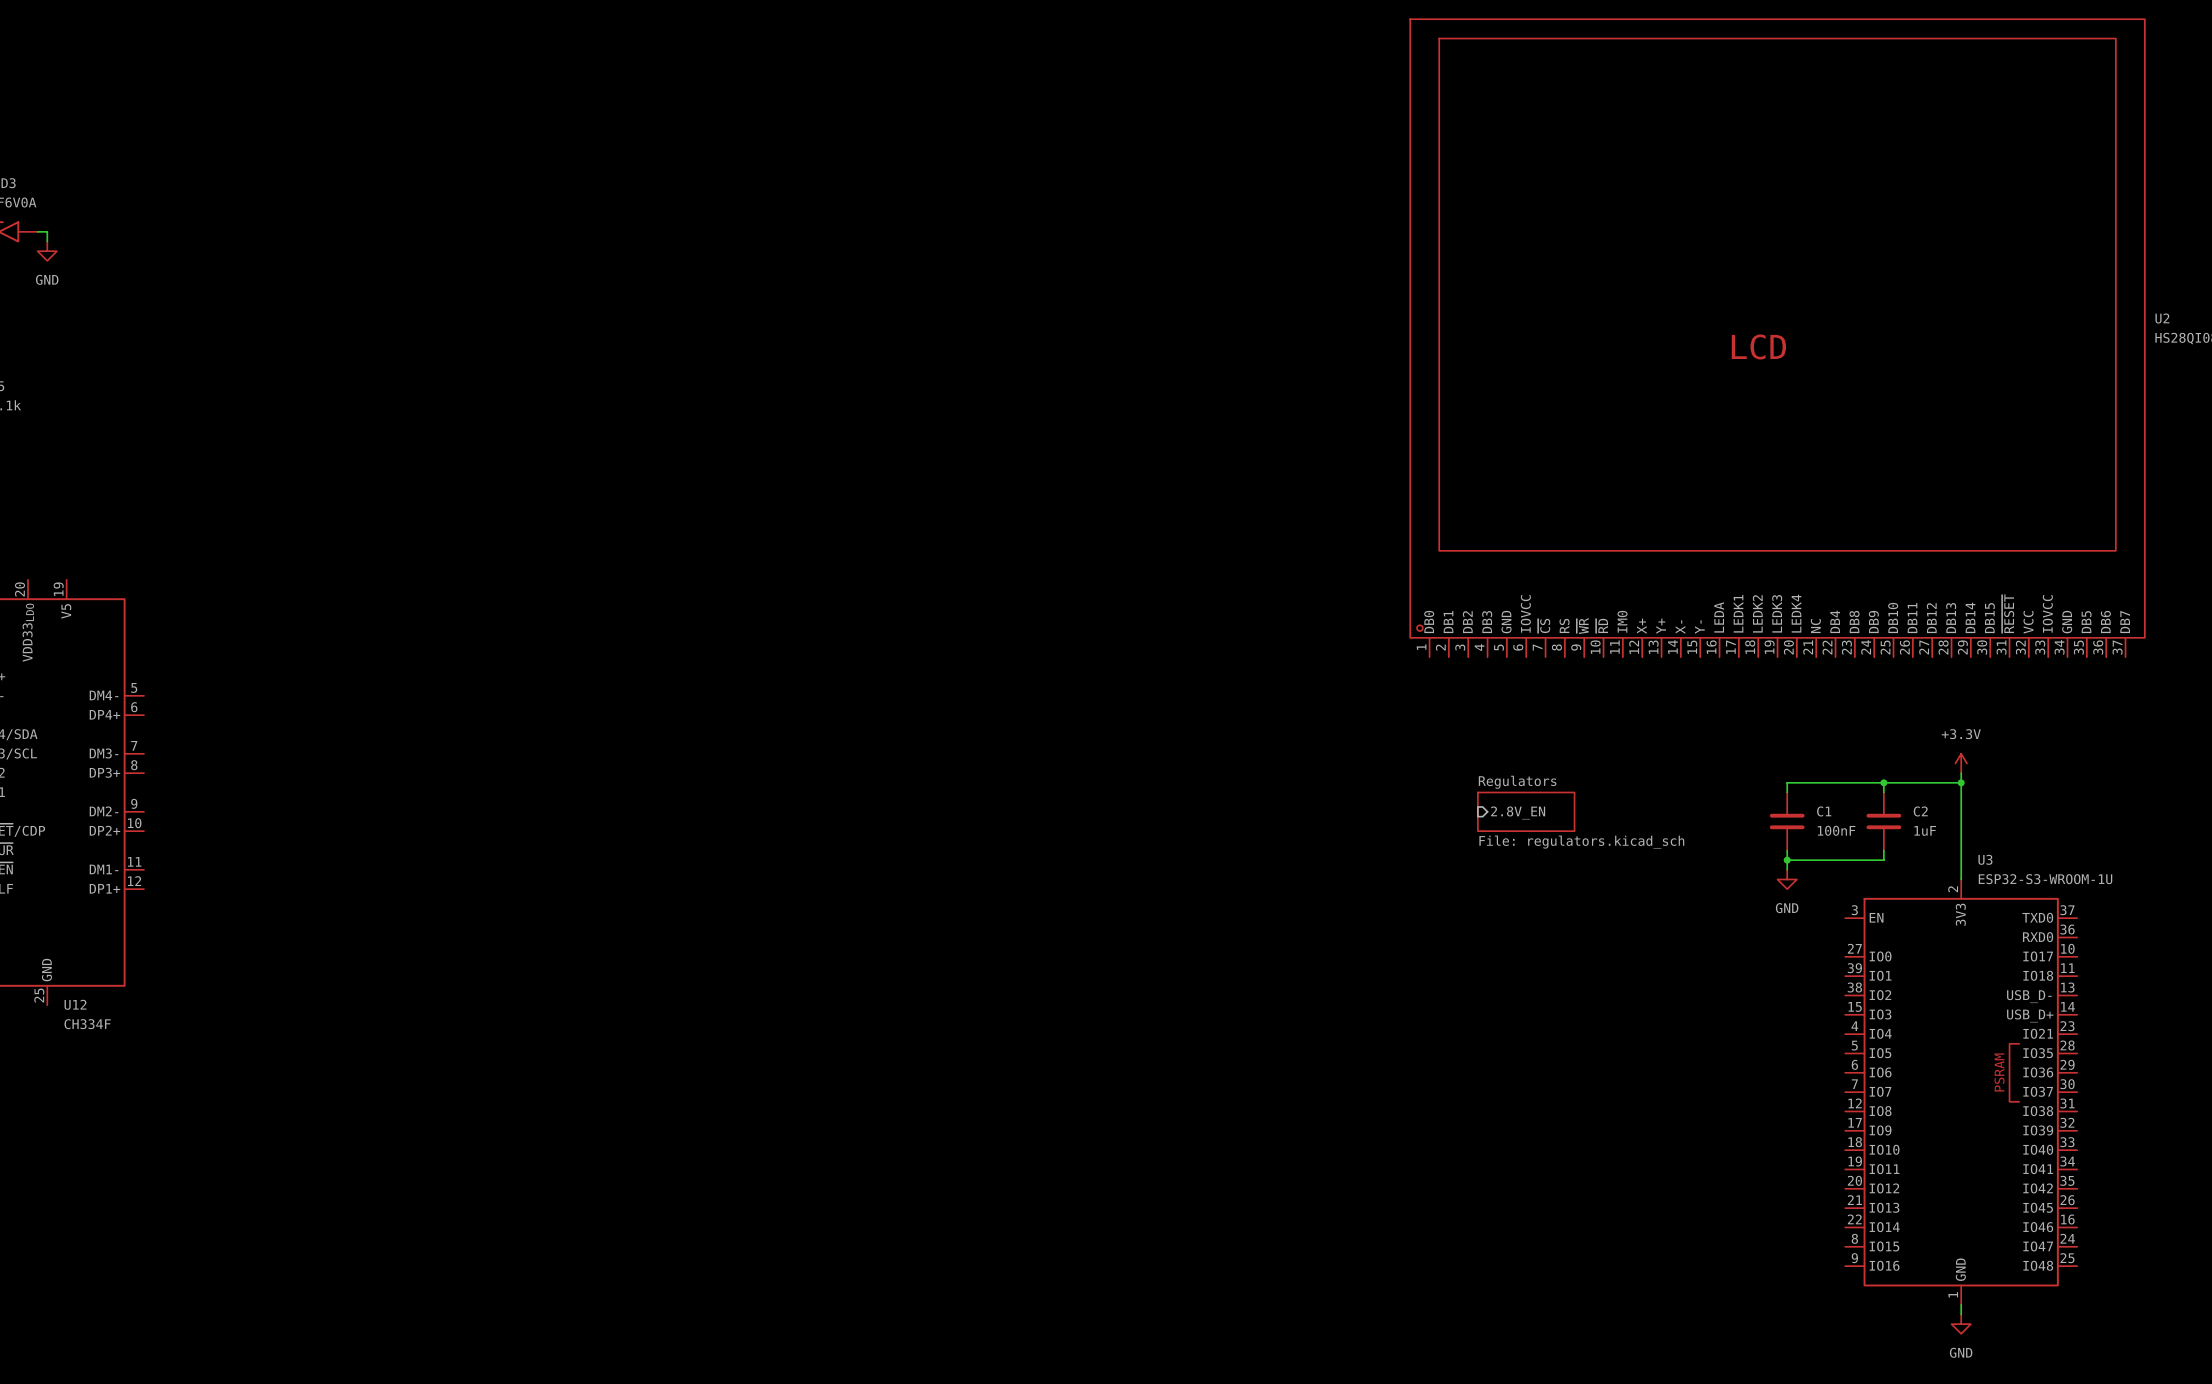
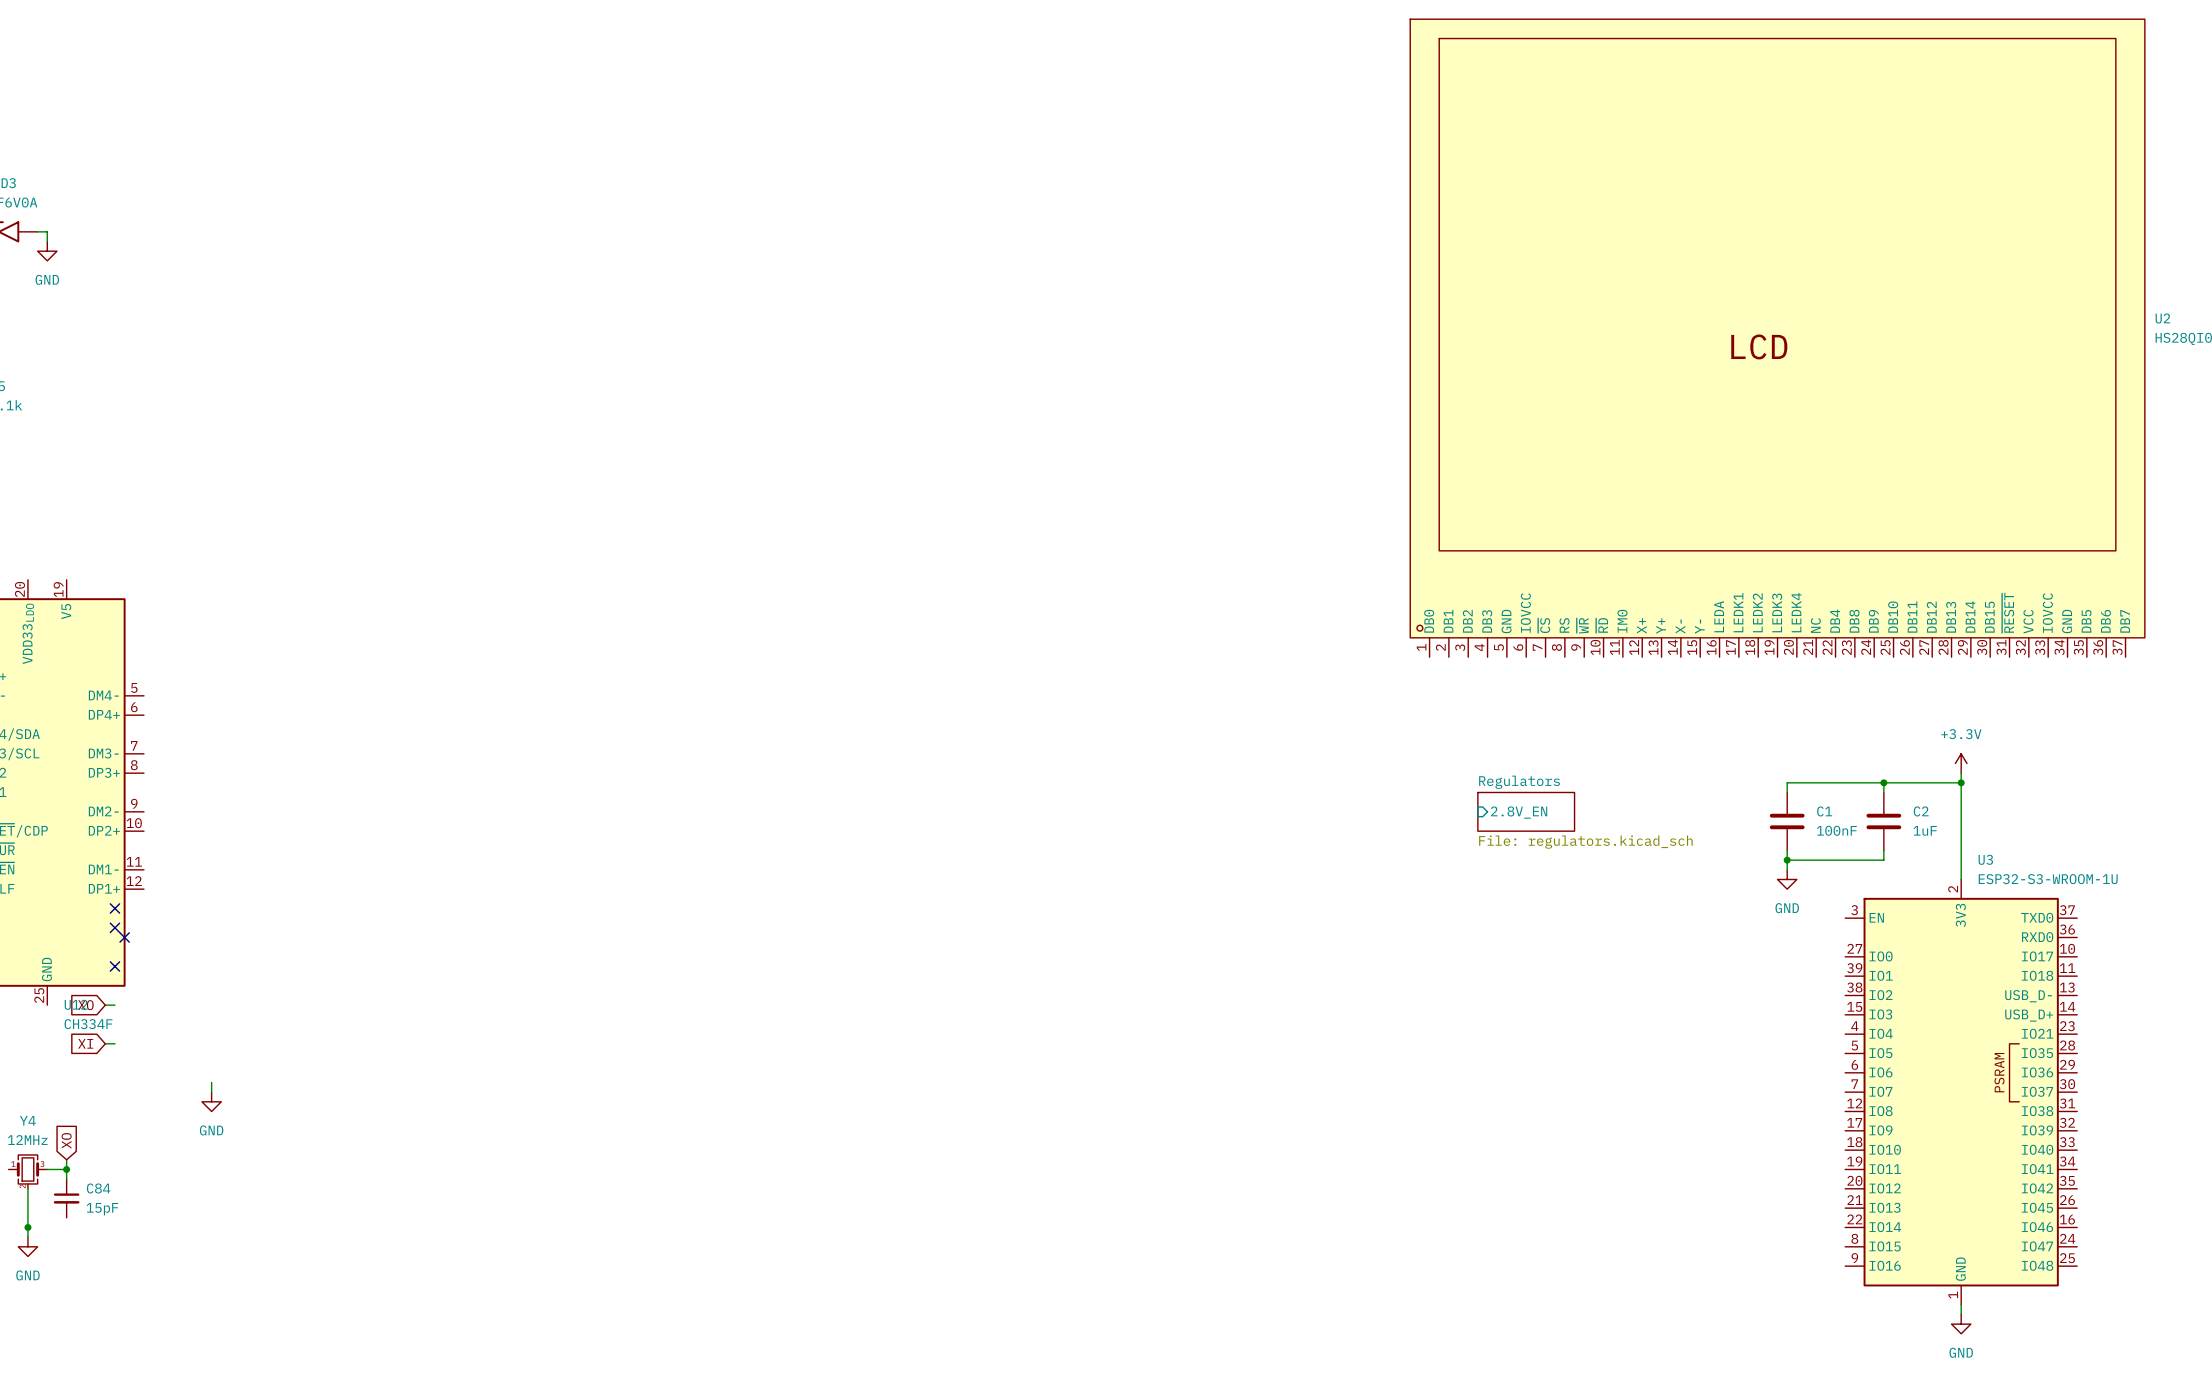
no-connect mark: none -> (114, 908)
no-connect mark: none -> (114, 927)
no-connect mark: none -> (124, 937)
no-connect mark: none -> (114, 966)
global label: none -> XO (85, 1005)
wire: none -> (105, 1005) (114, 1005)
global label: none -> XI (85, 1043)
wire: none -> (105, 1043) (114, 1043)
wire: none -> (211, 1082) (211, 1092)
power symbol: none -> GND (211, 1101)
global label: none -> XO (66, 1140)
wire: none -> (66, 1159) (66, 1179)
wire: none -> (47, 1169) (66, 1169)
junction: none -> (66, 1169)
Y4: none -> 12MHz (27, 1171)
wire: none -> (27, 1188) (27, 1237)
C84: none -> 15pF (66, 1198)
junction: none -> (27, 1227)
power symbol: none -> GND (27, 1246)

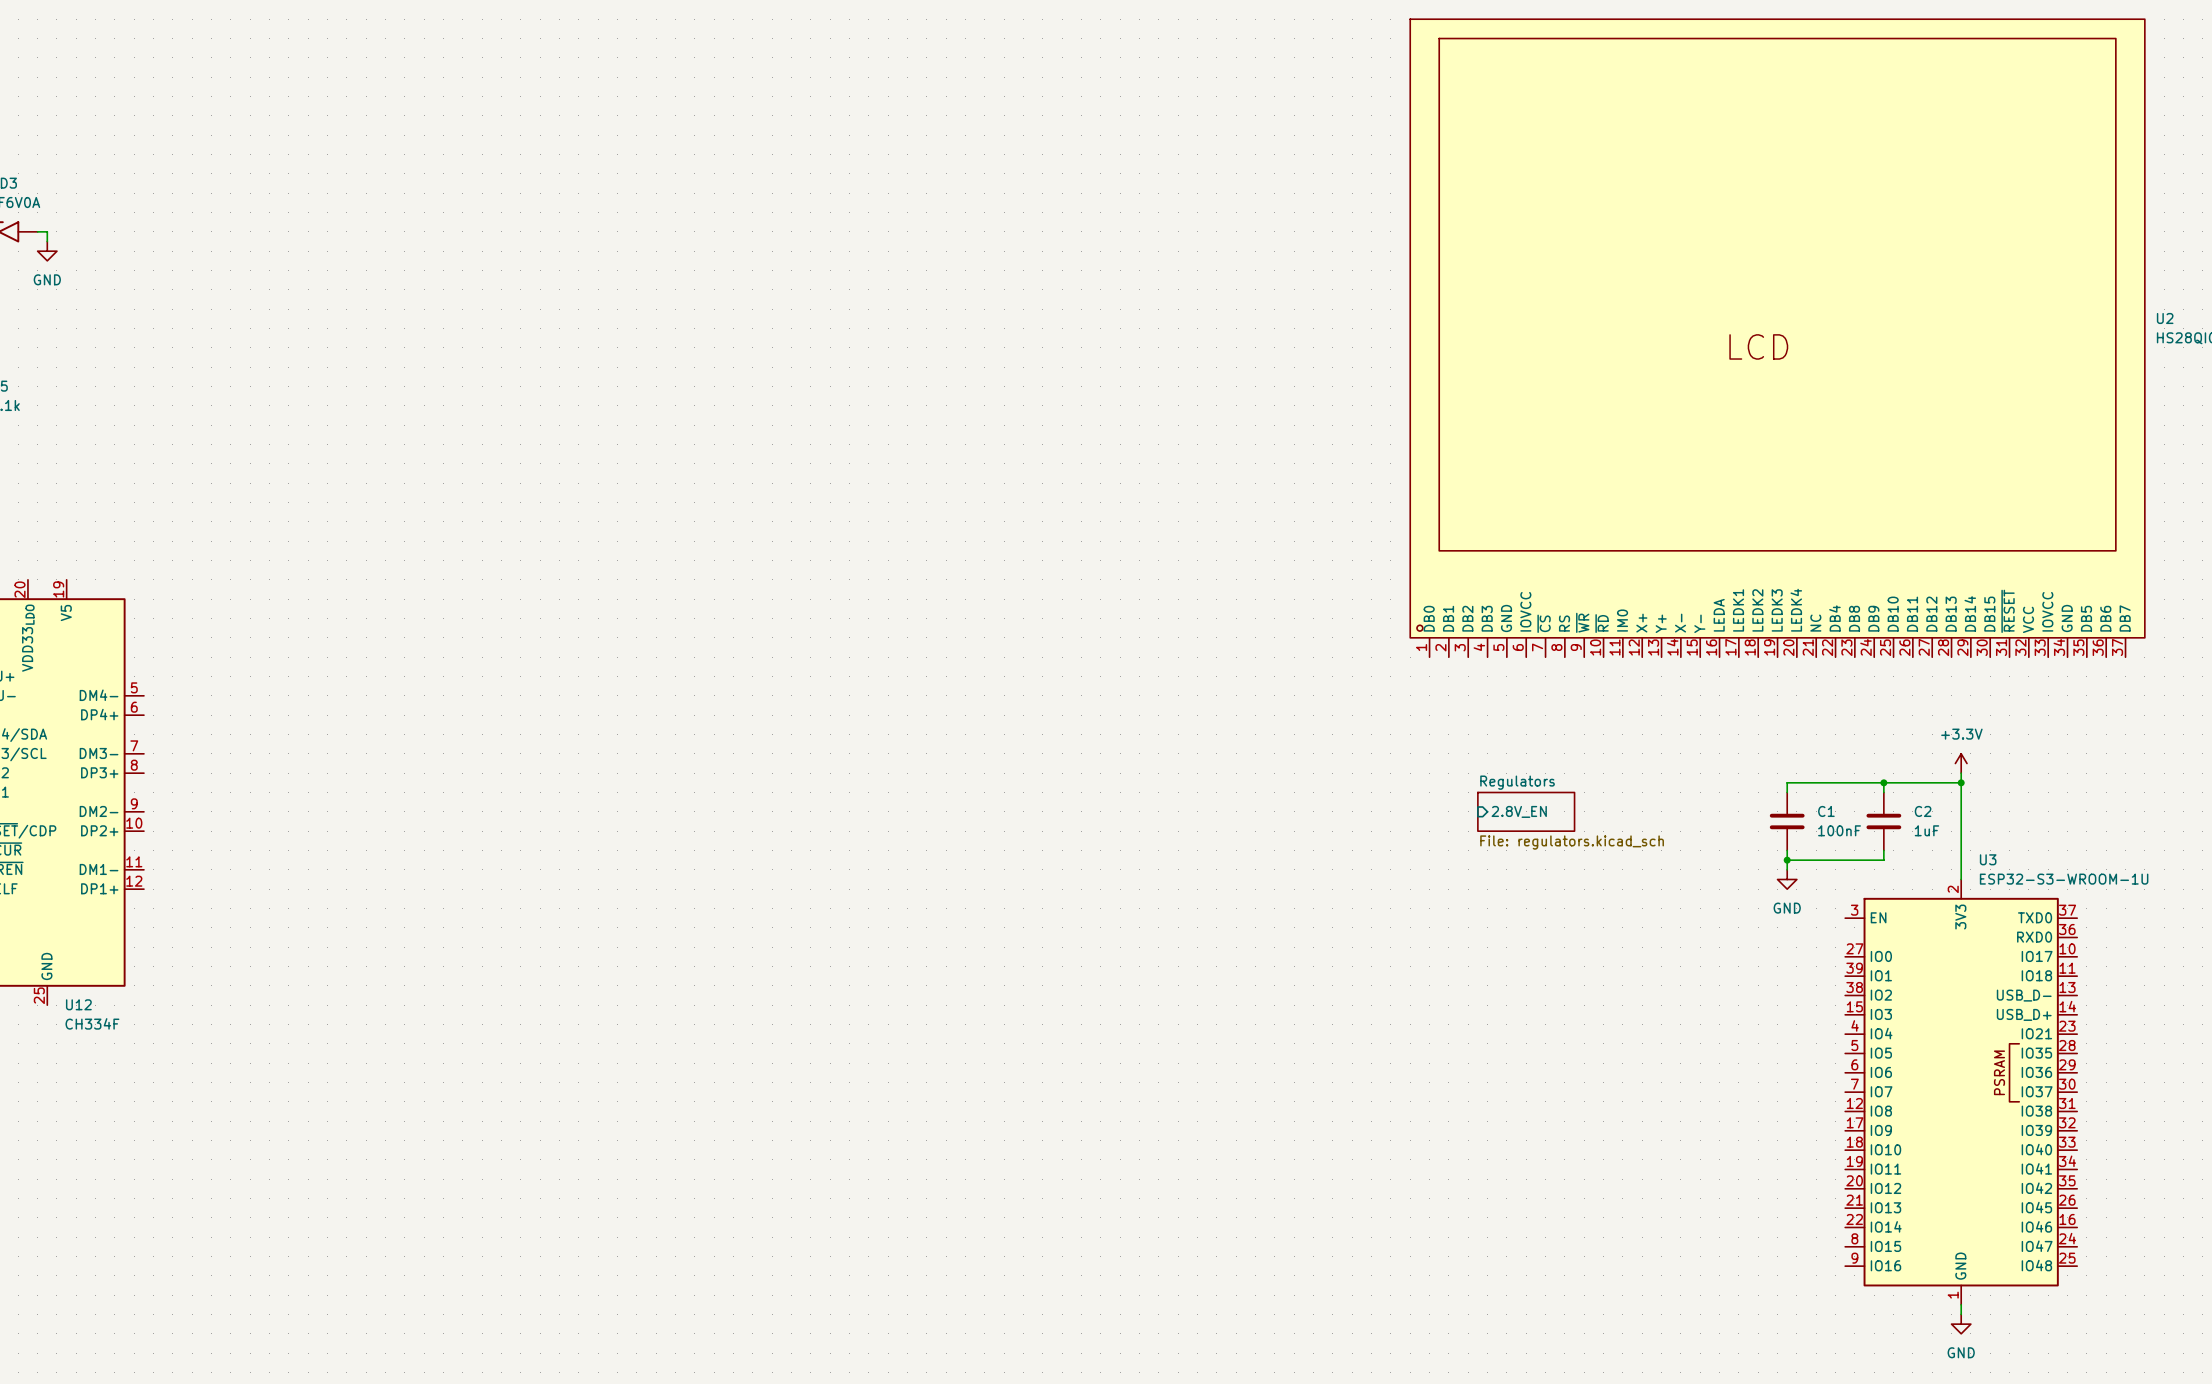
no-connect mark: (114, 908) -> none
no-connect mark: (114, 927) -> none
no-connect mark: (124, 937) -> none
no-connect mark: (114, 966) -> none
global label: XO (85, 1005) -> none
wire: (105, 1005) (114, 1005) -> none
global label: XI (85, 1043) -> none
wire: (105, 1043) (114, 1043) -> none
wire: (211, 1082) (211, 1092) -> none
power symbol: GND (211, 1101) -> none
global label: XO (66, 1140) -> none
wire: (66, 1159) (66, 1179) -> none
wire: (47, 1169) (66, 1169) -> none
junction: (66, 1169) -> none
Y4: 12MHz (27, 1171) -> none
wire: (27, 1188) (27, 1237) -> none
C84: 15pF (66, 1198) -> none
junction: (27, 1227) -> none
power symbol: GND (27, 1246) -> none

